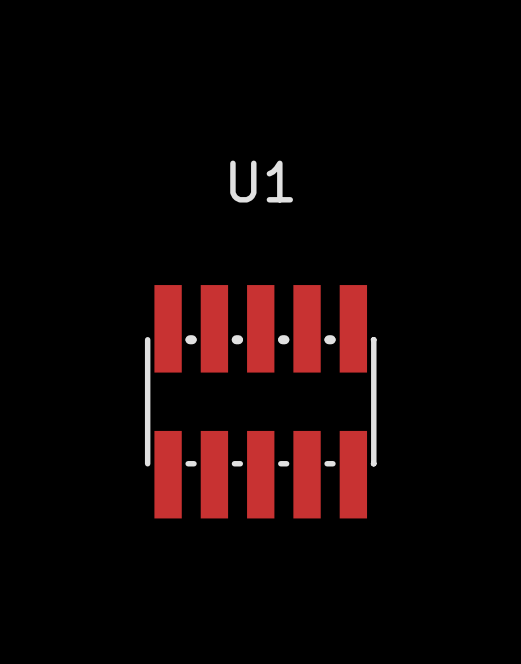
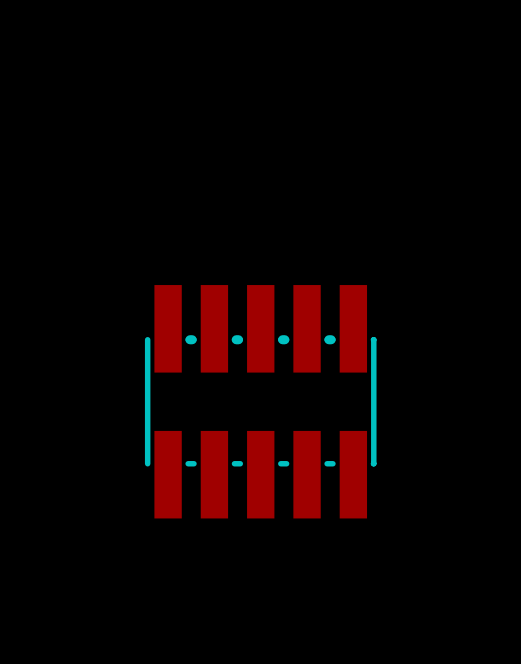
U1 name: U1 (261, 181) -> none

